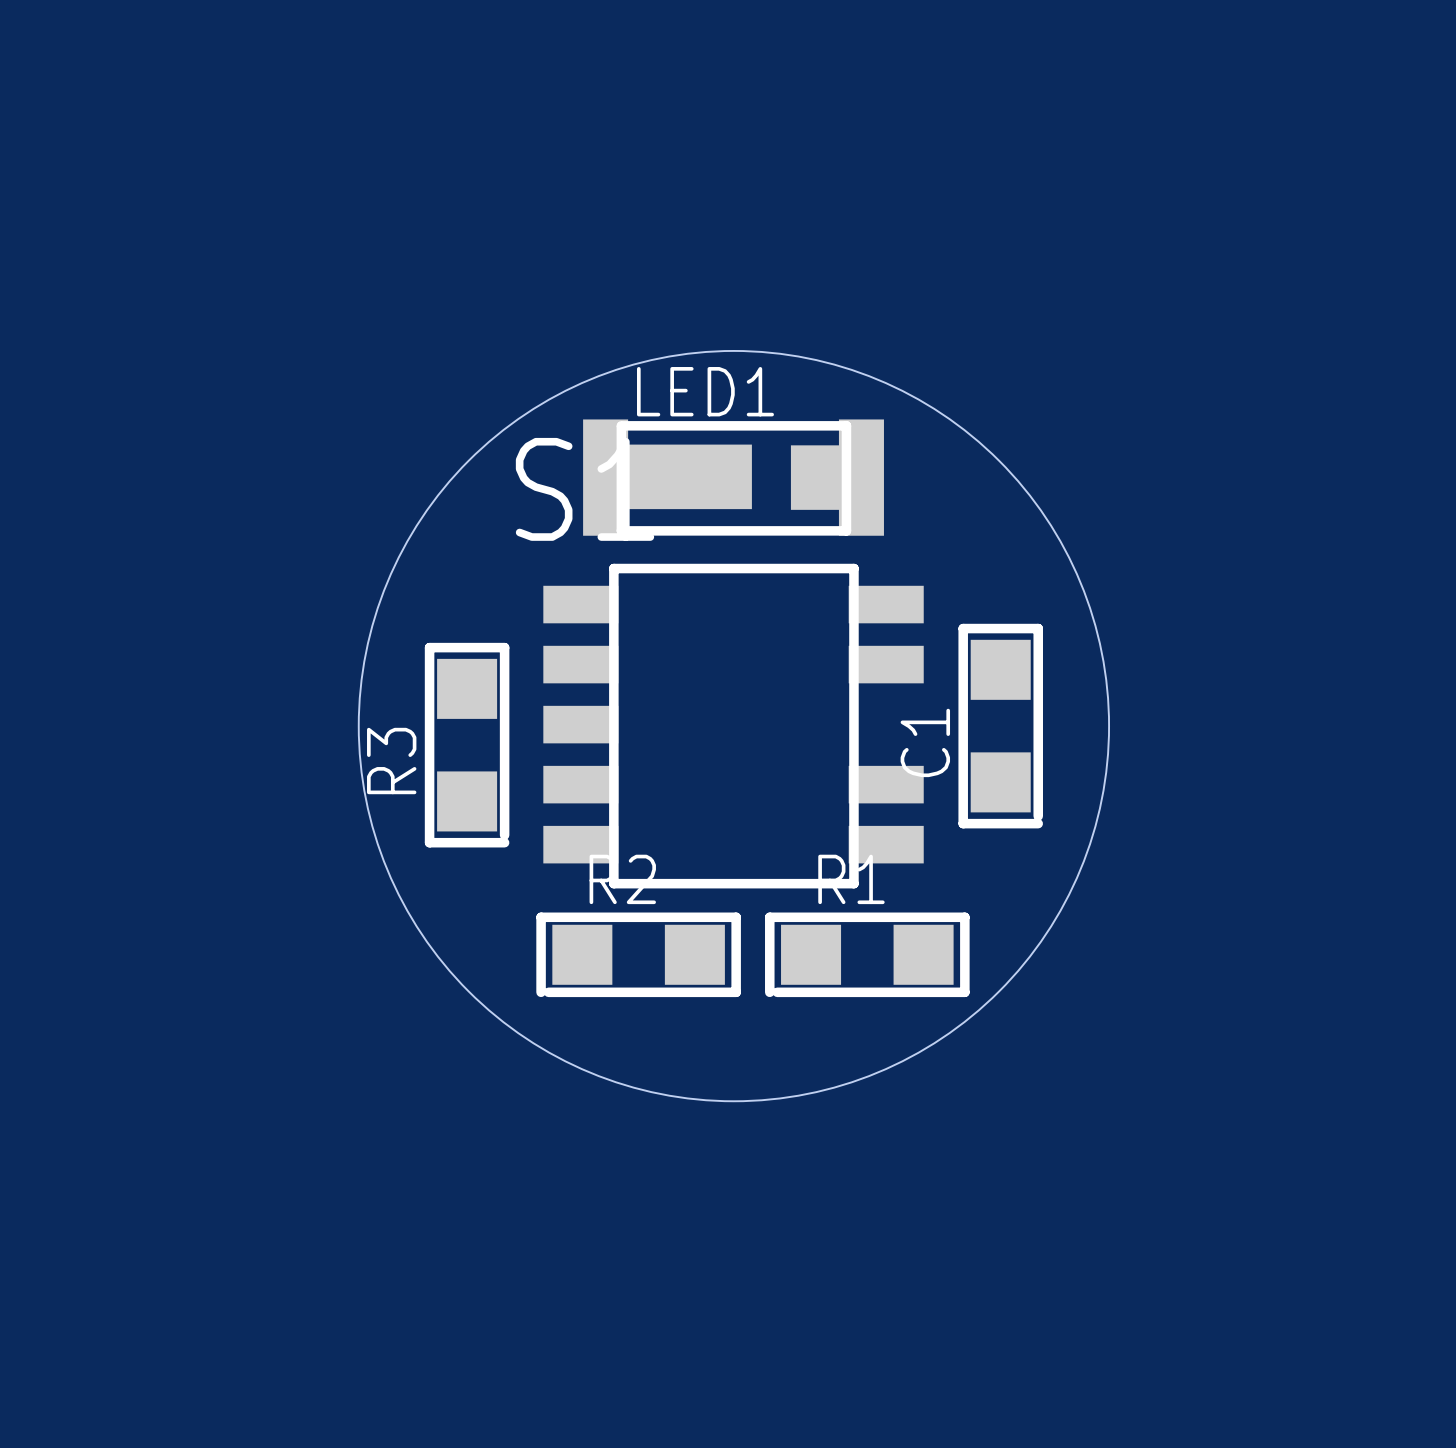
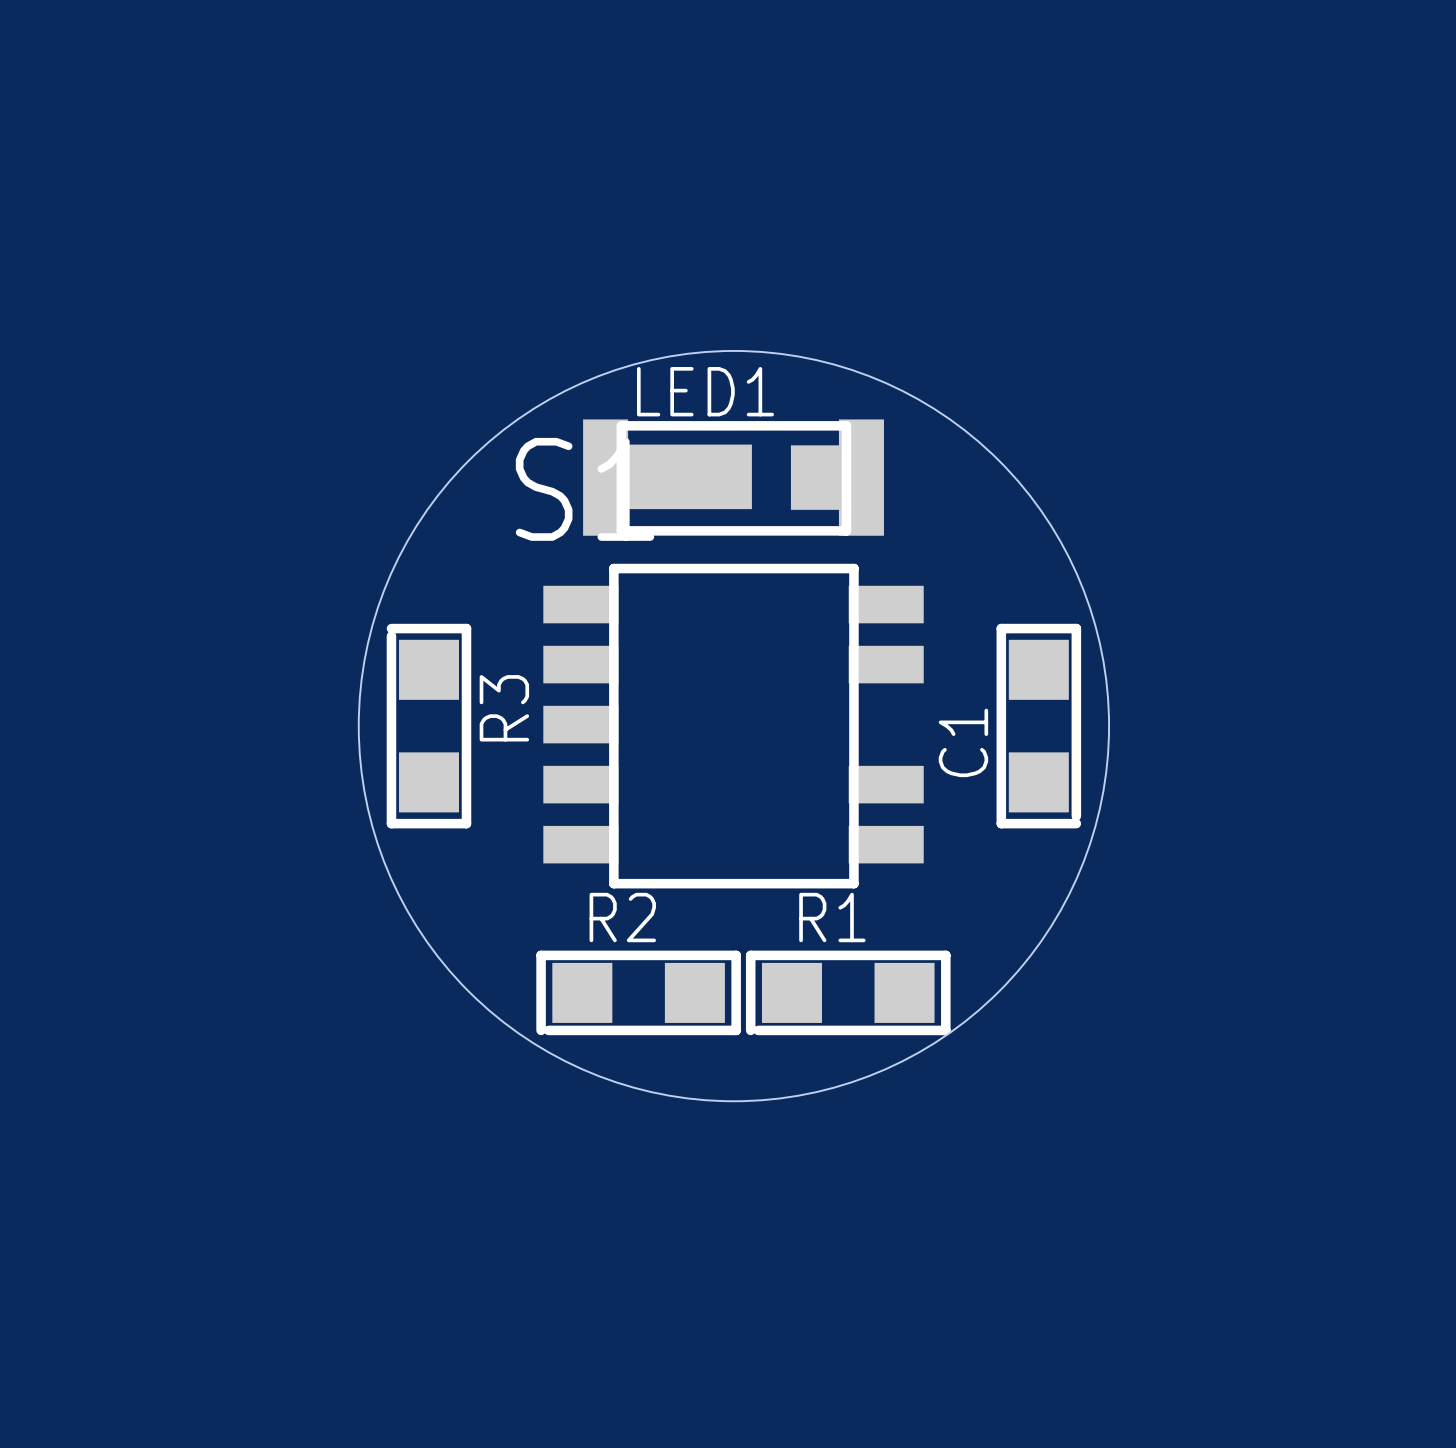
C1 position: (1000, 726) -> (1038, 726)
R3 rotation: 0° (467, 745) -> 180° (428, 726)
R2 position: (638, 954) -> (638, 992)
R1 position: (867, 954) -> (848, 992)

